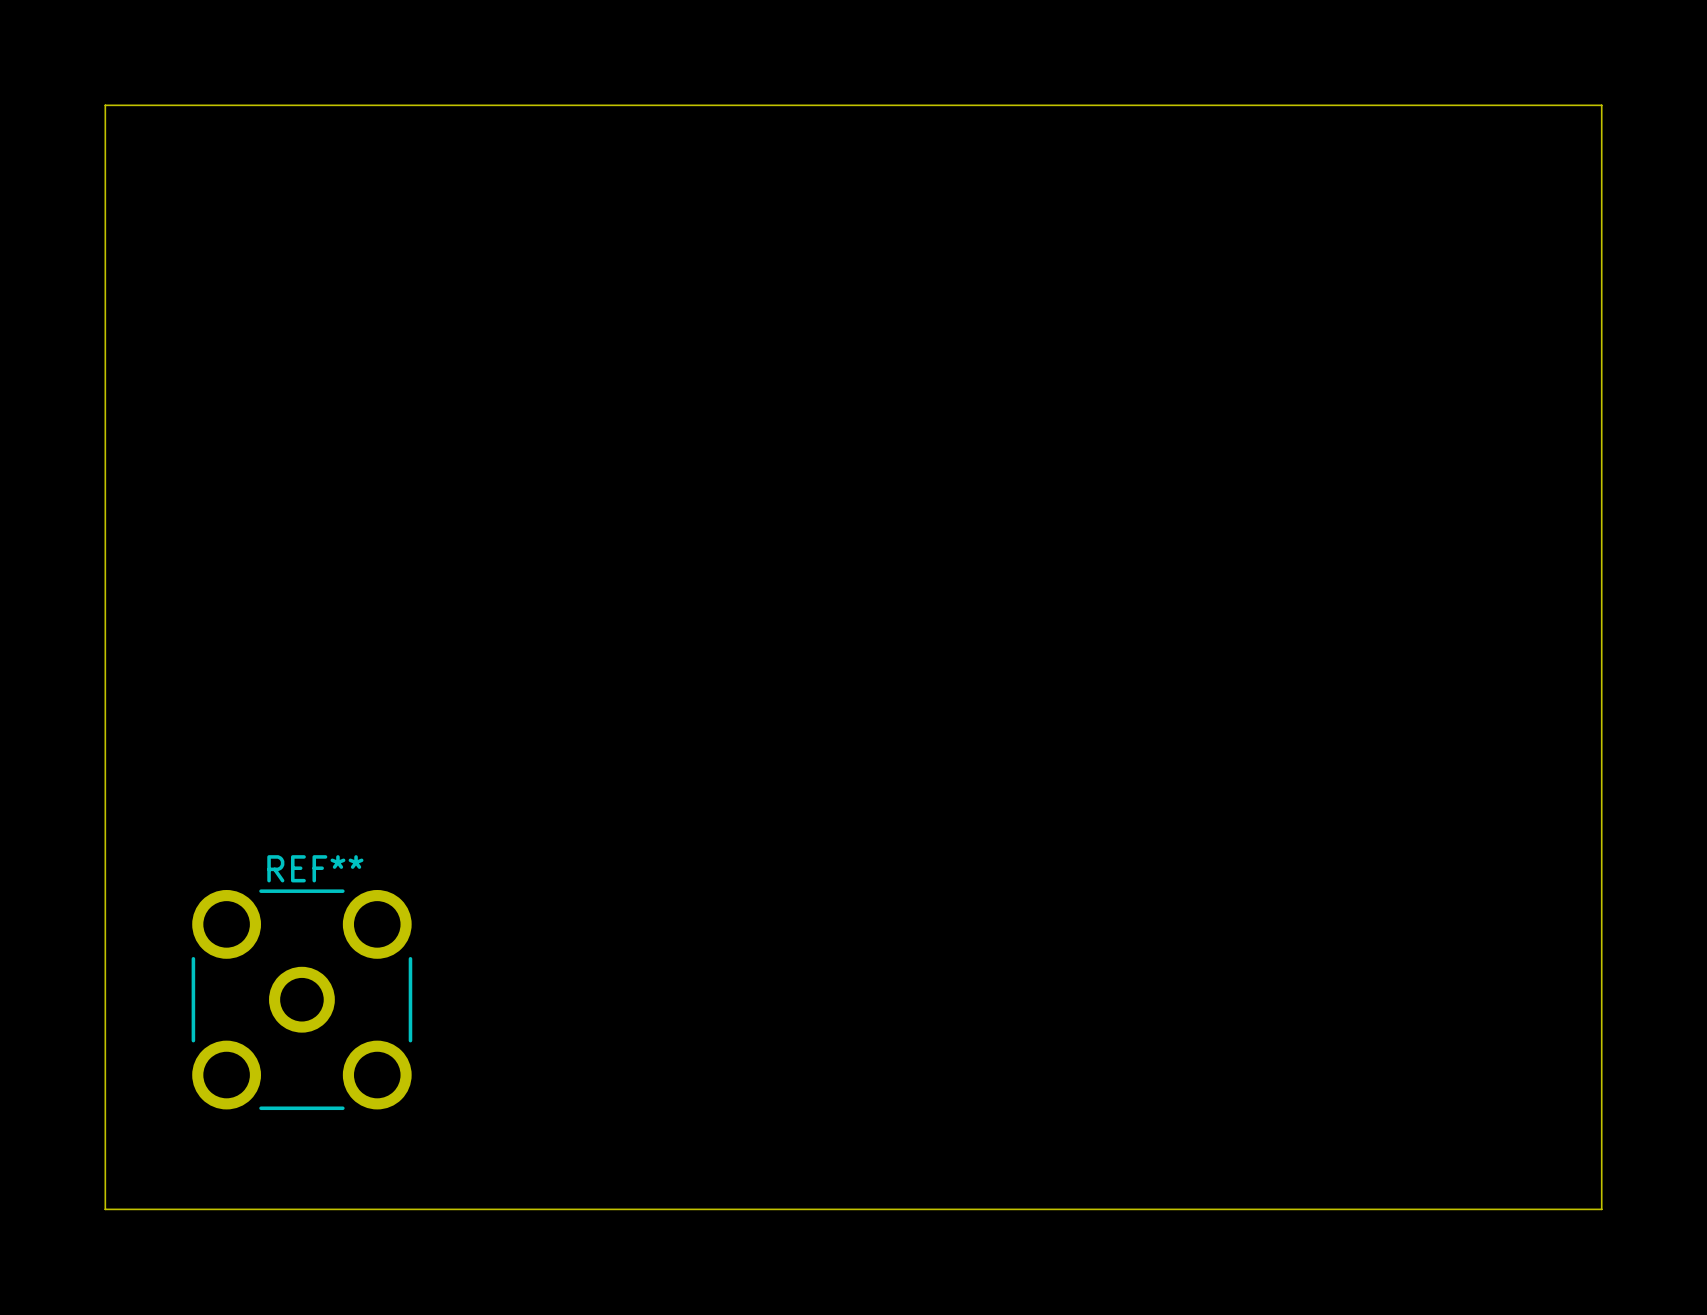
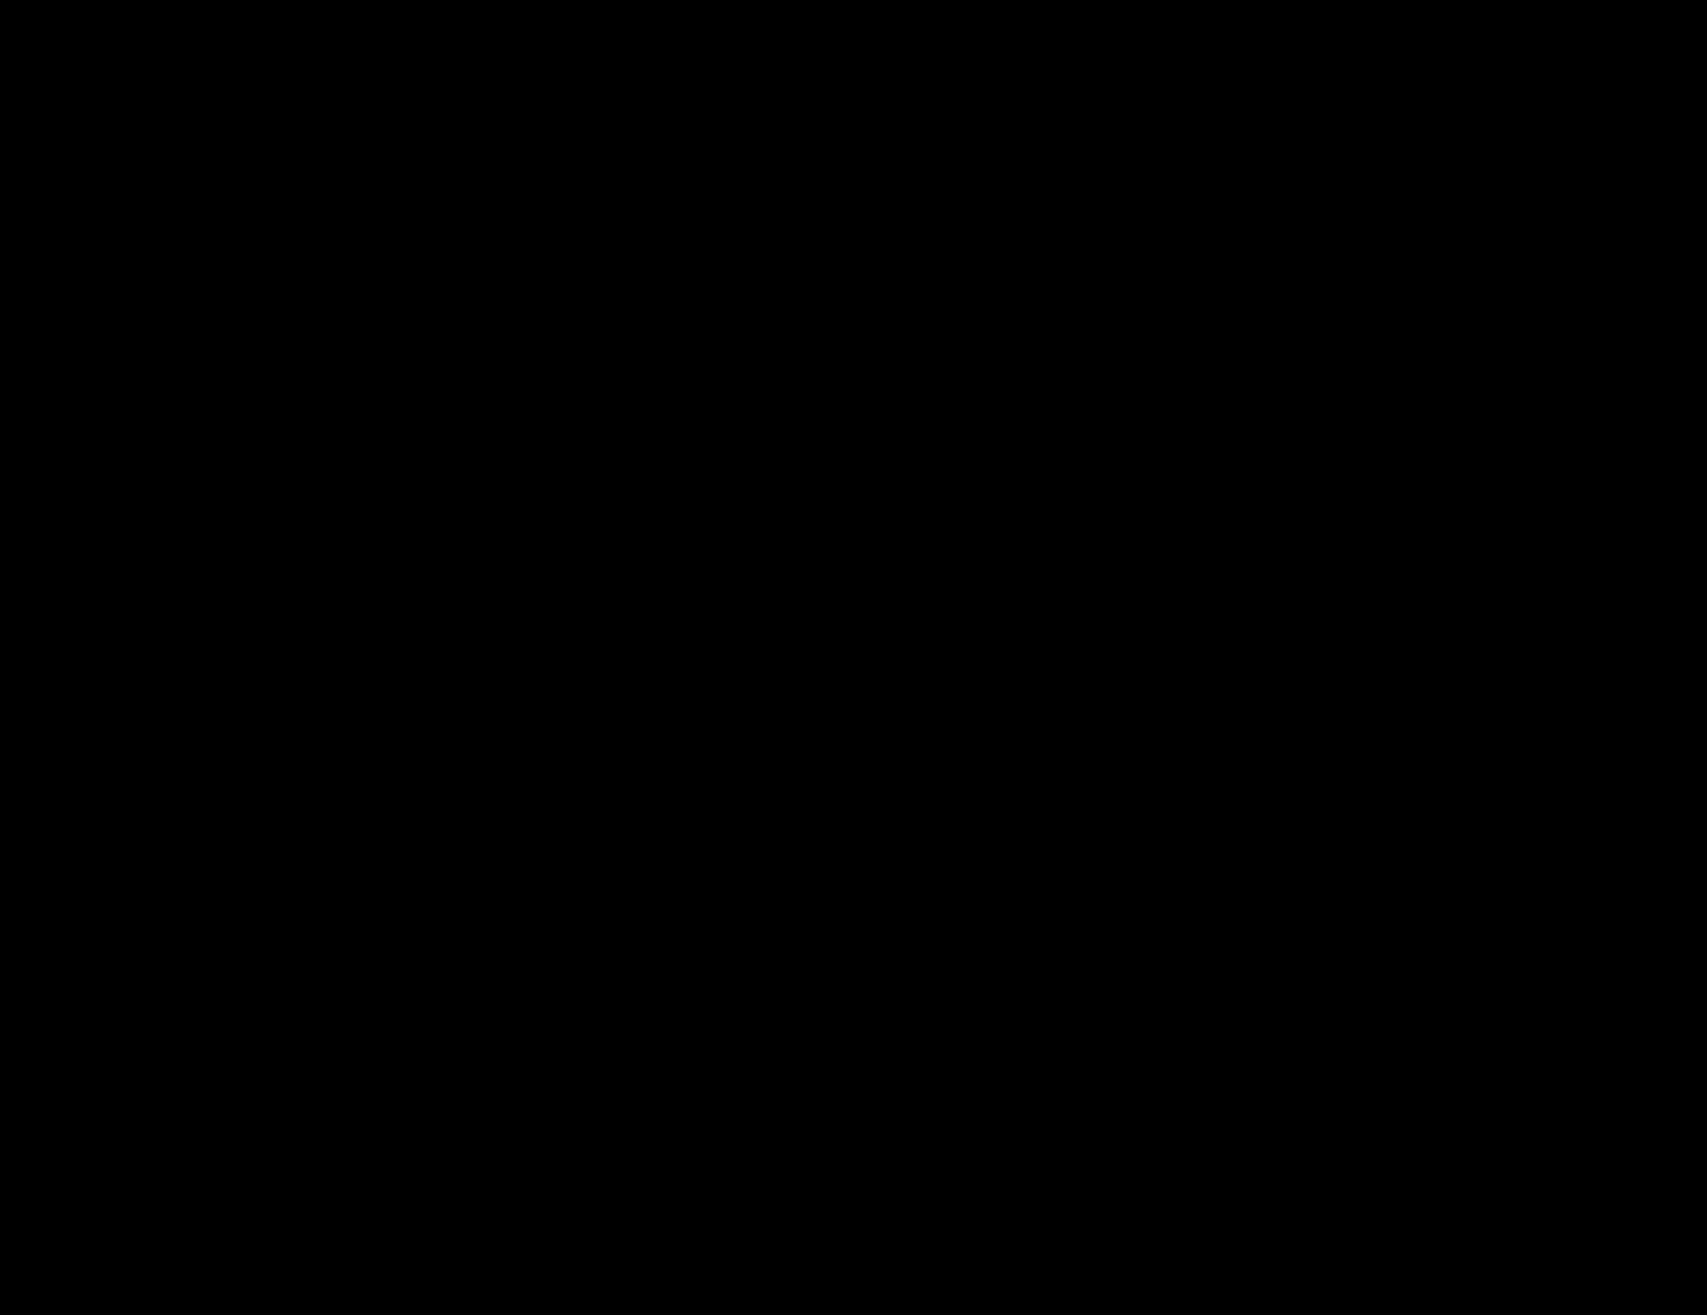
board edge: (105, 105) (1601, 105) (1601, 1209) (105, 1209) (105, 105) -> none
REF**: (301, 999) -> none

